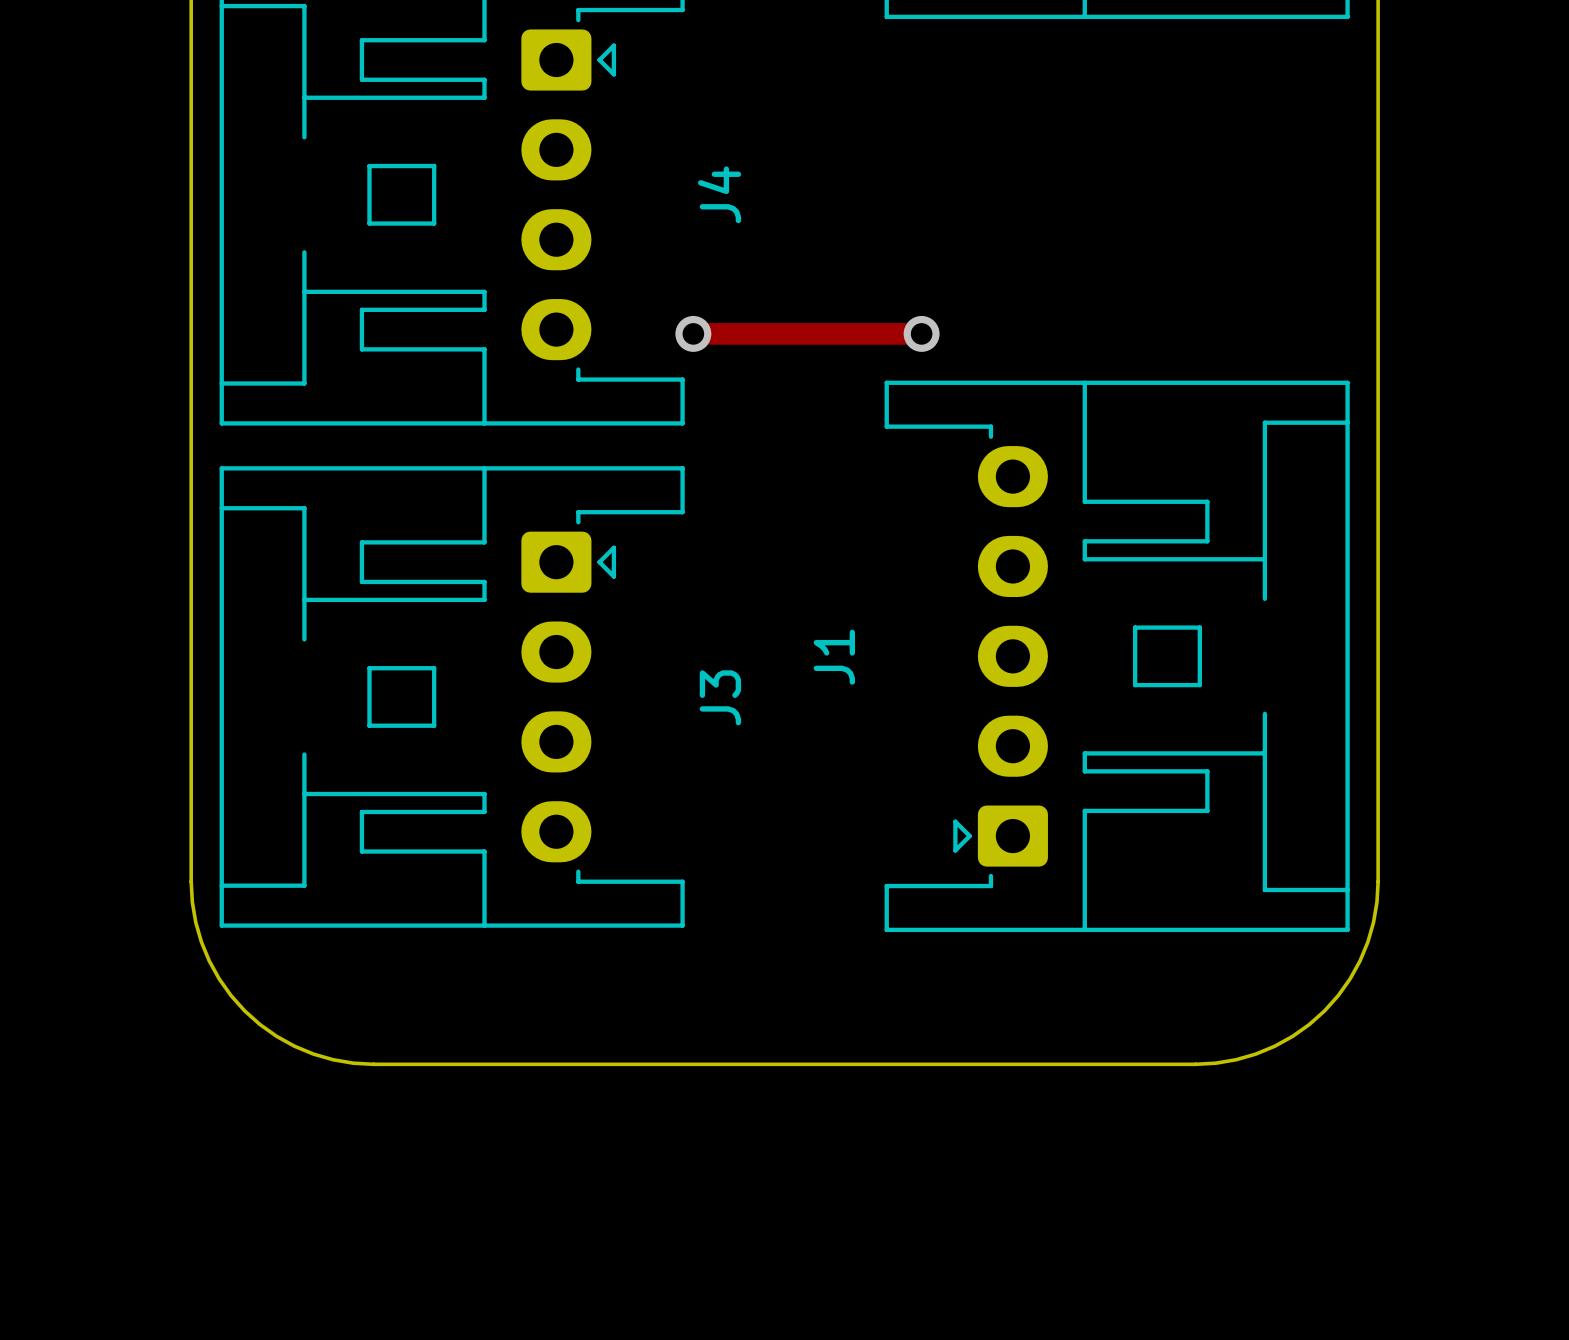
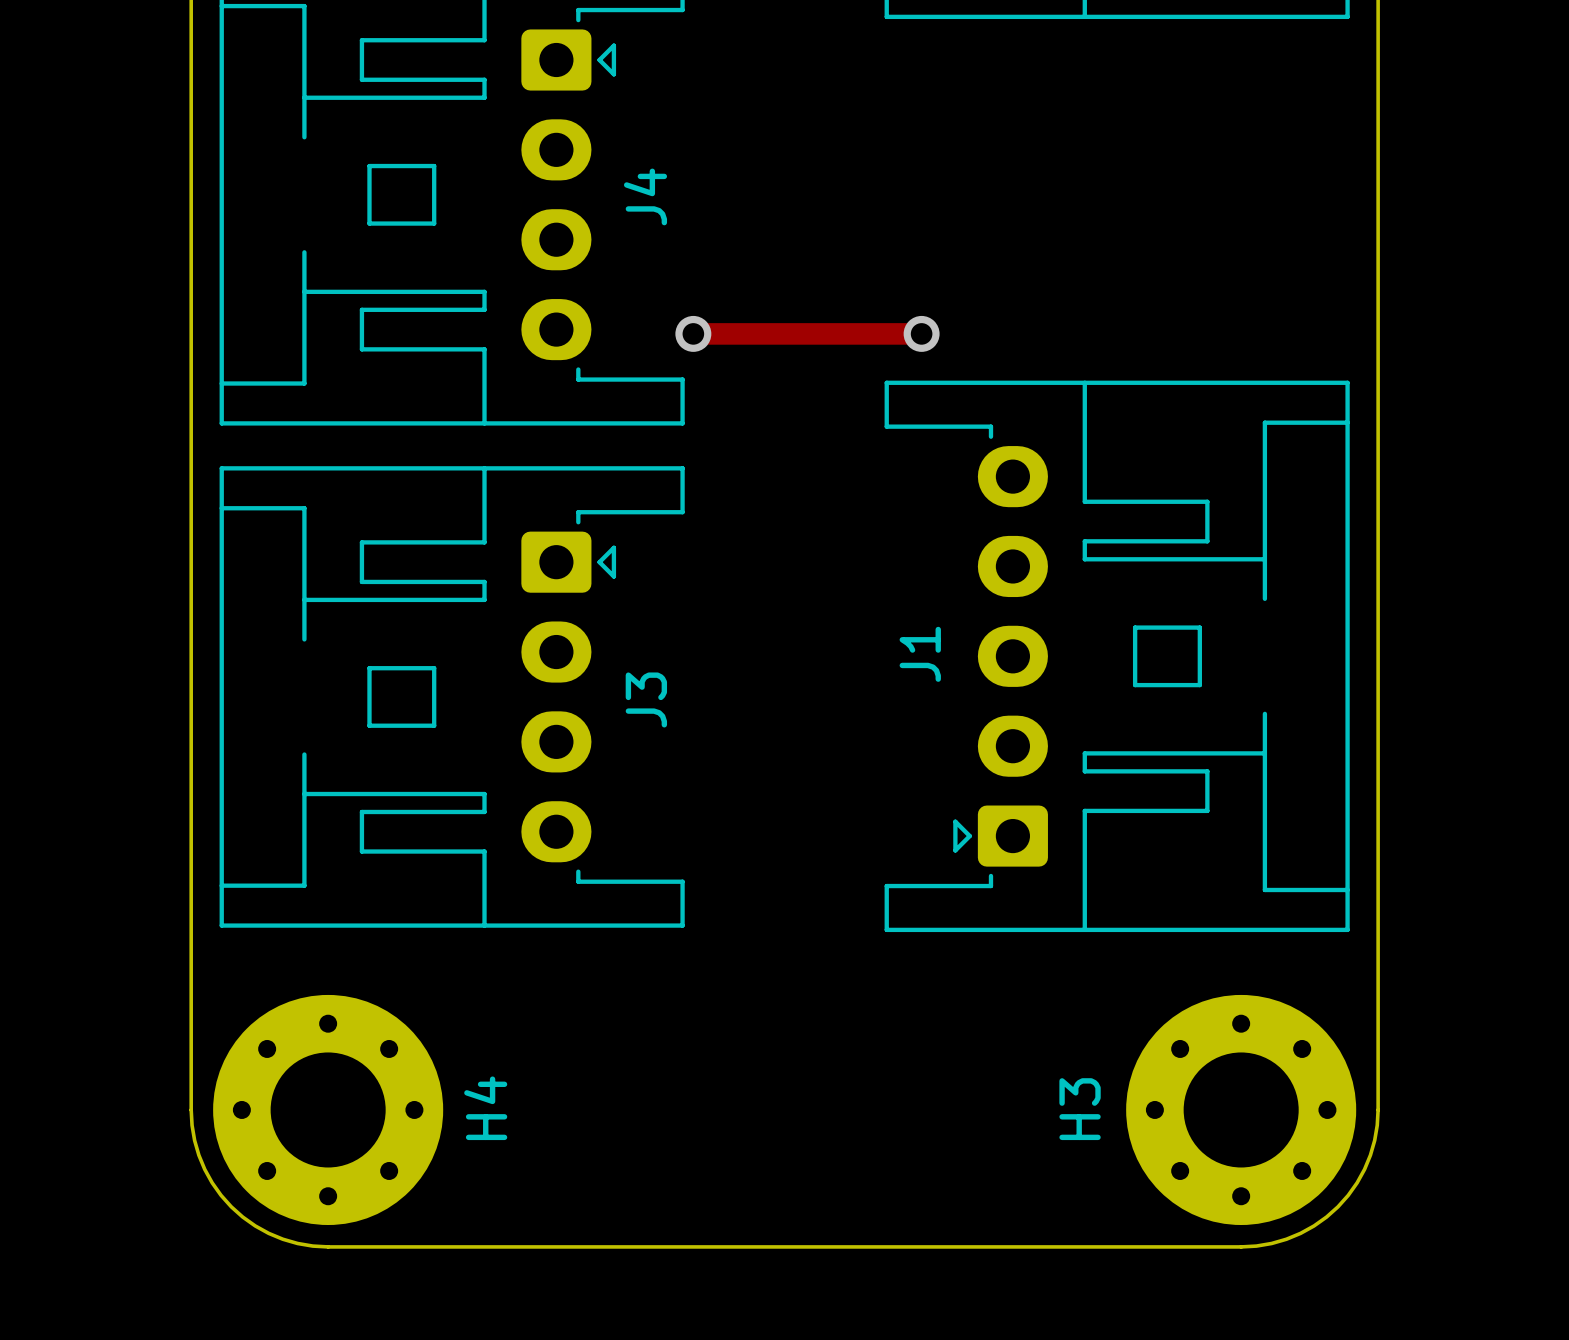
J4 name position: J4 (719, 194) -> J4 (645, 196)
J1 name position: J1 (834, 657) -> J1 (920, 654)
J3 name position: J3 (720, 697) -> J3 (646, 699)
board edge: (191, 881) (192, 902) (201, 942) (219, 978) (244, 1010) (276, 1036) (313, 1054) (353, 1063) (373, 1064) (1195, 1064) (1236, 1059) (1255, 1054) (1292, 1036) (1309, 1024) (1338, 995) (1360, 960) (1367, 942) (1373, 922) (1378, 881) -> (191, 881) (191, 1109) (194, 1140) (198, 1155) (204, 1169) (221, 1195) (231, 1206) (255, 1225) (282, 1239) (297, 1243) (328, 1246) (1241, 1246) (1256, 1246) (1286, 1239) (1300, 1233) (1326, 1217) (1348, 1195) (1364, 1169) (1374, 1140) (1378, 1109) (1378, 881)
H4: none -> (328, 1109)
H3: none -> (1241, 1109)

